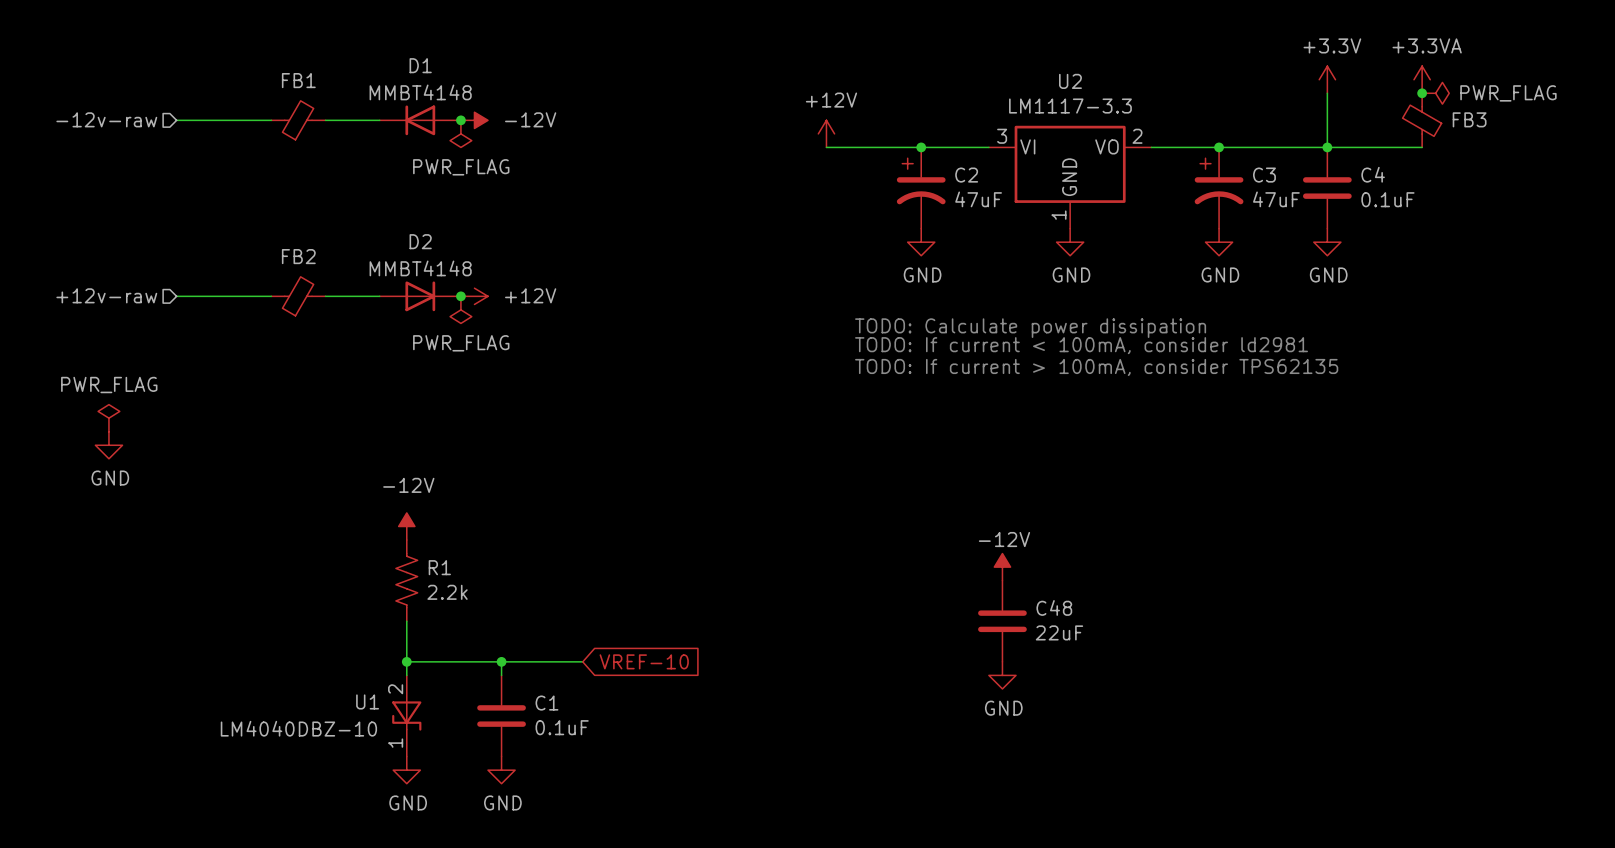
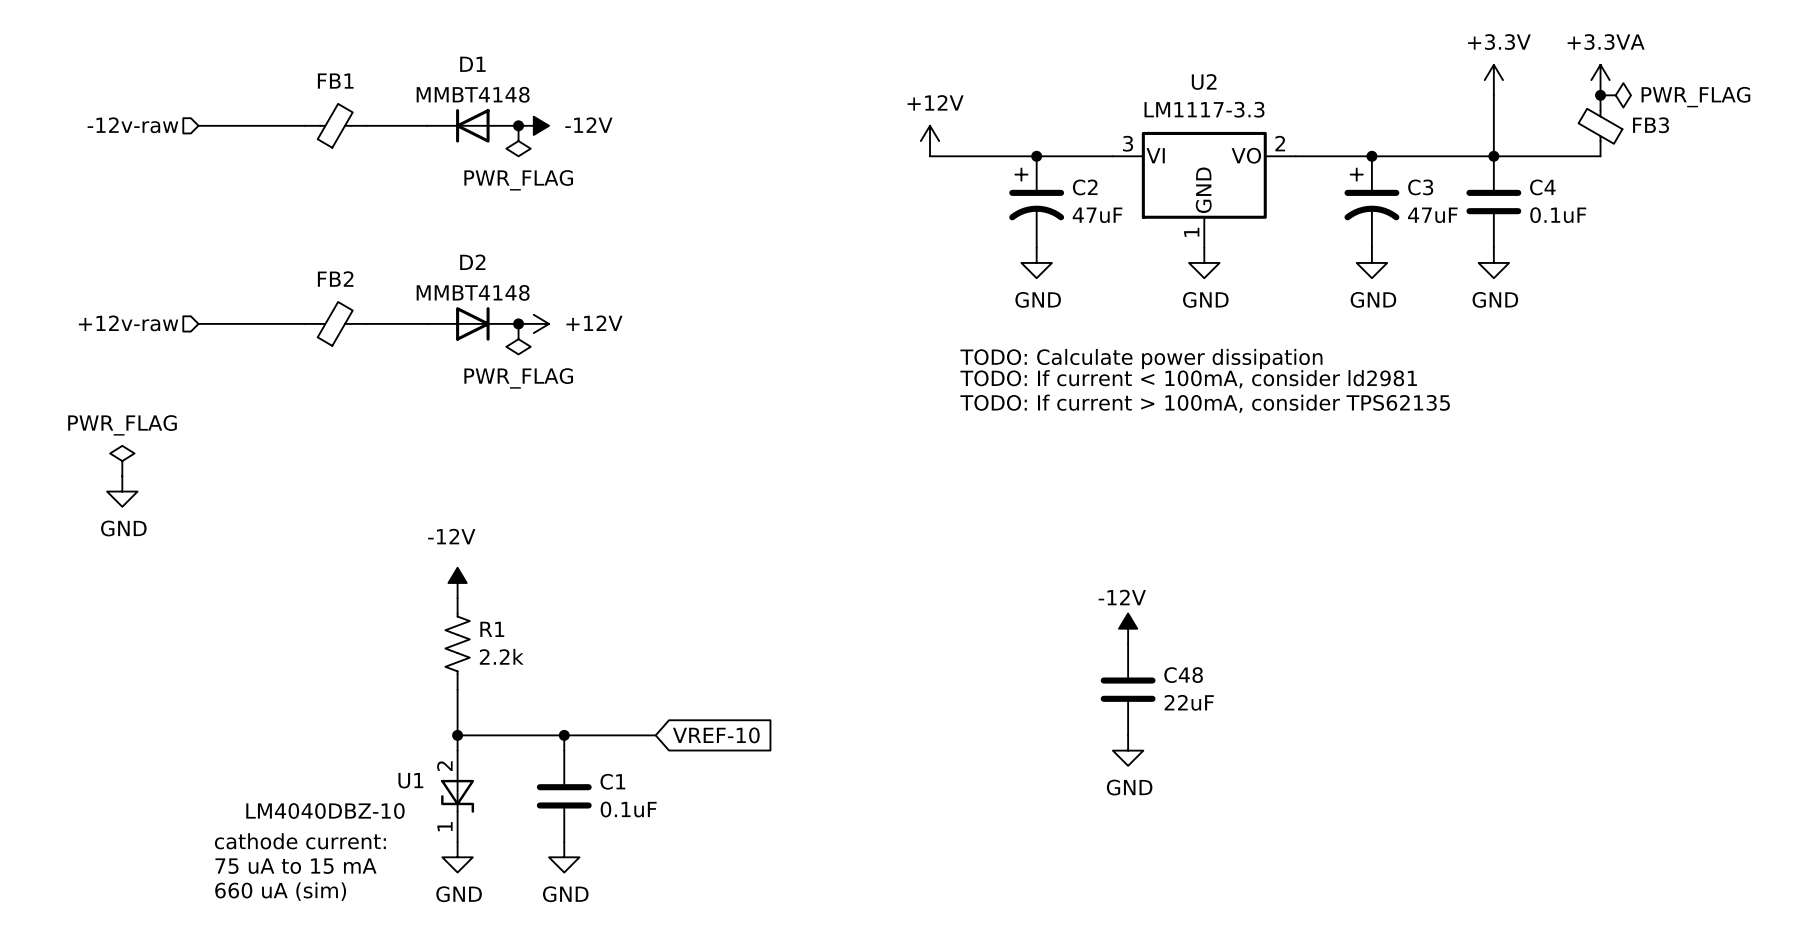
text: none -> cathode current: (300, 841)
text: none -> 75 uA to 15 mA (296, 866)
text: none -> 660 uA (sim) (280, 891)

